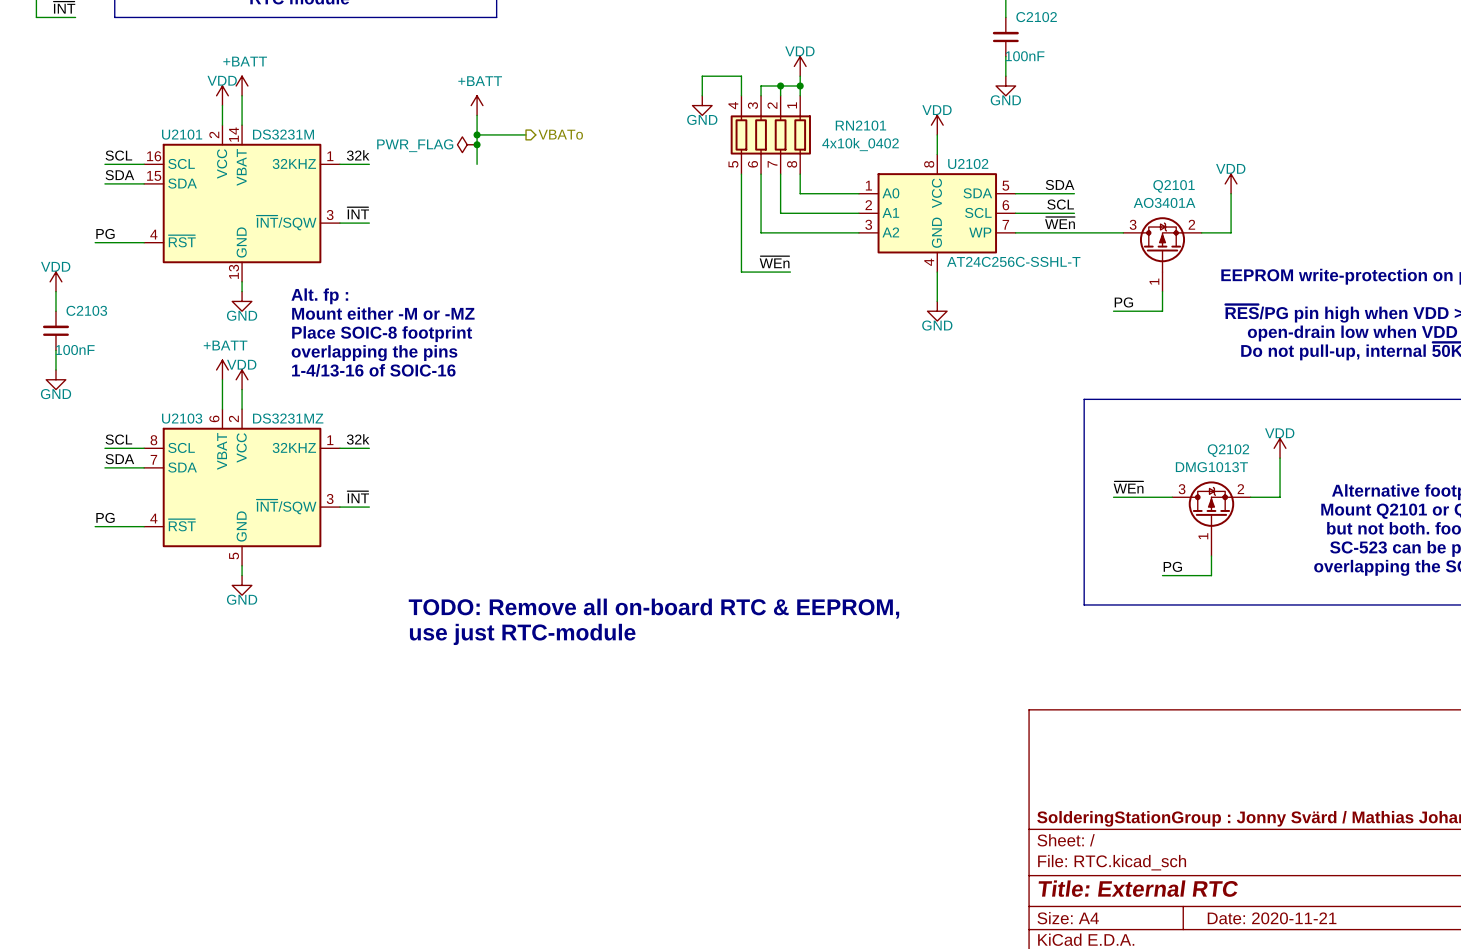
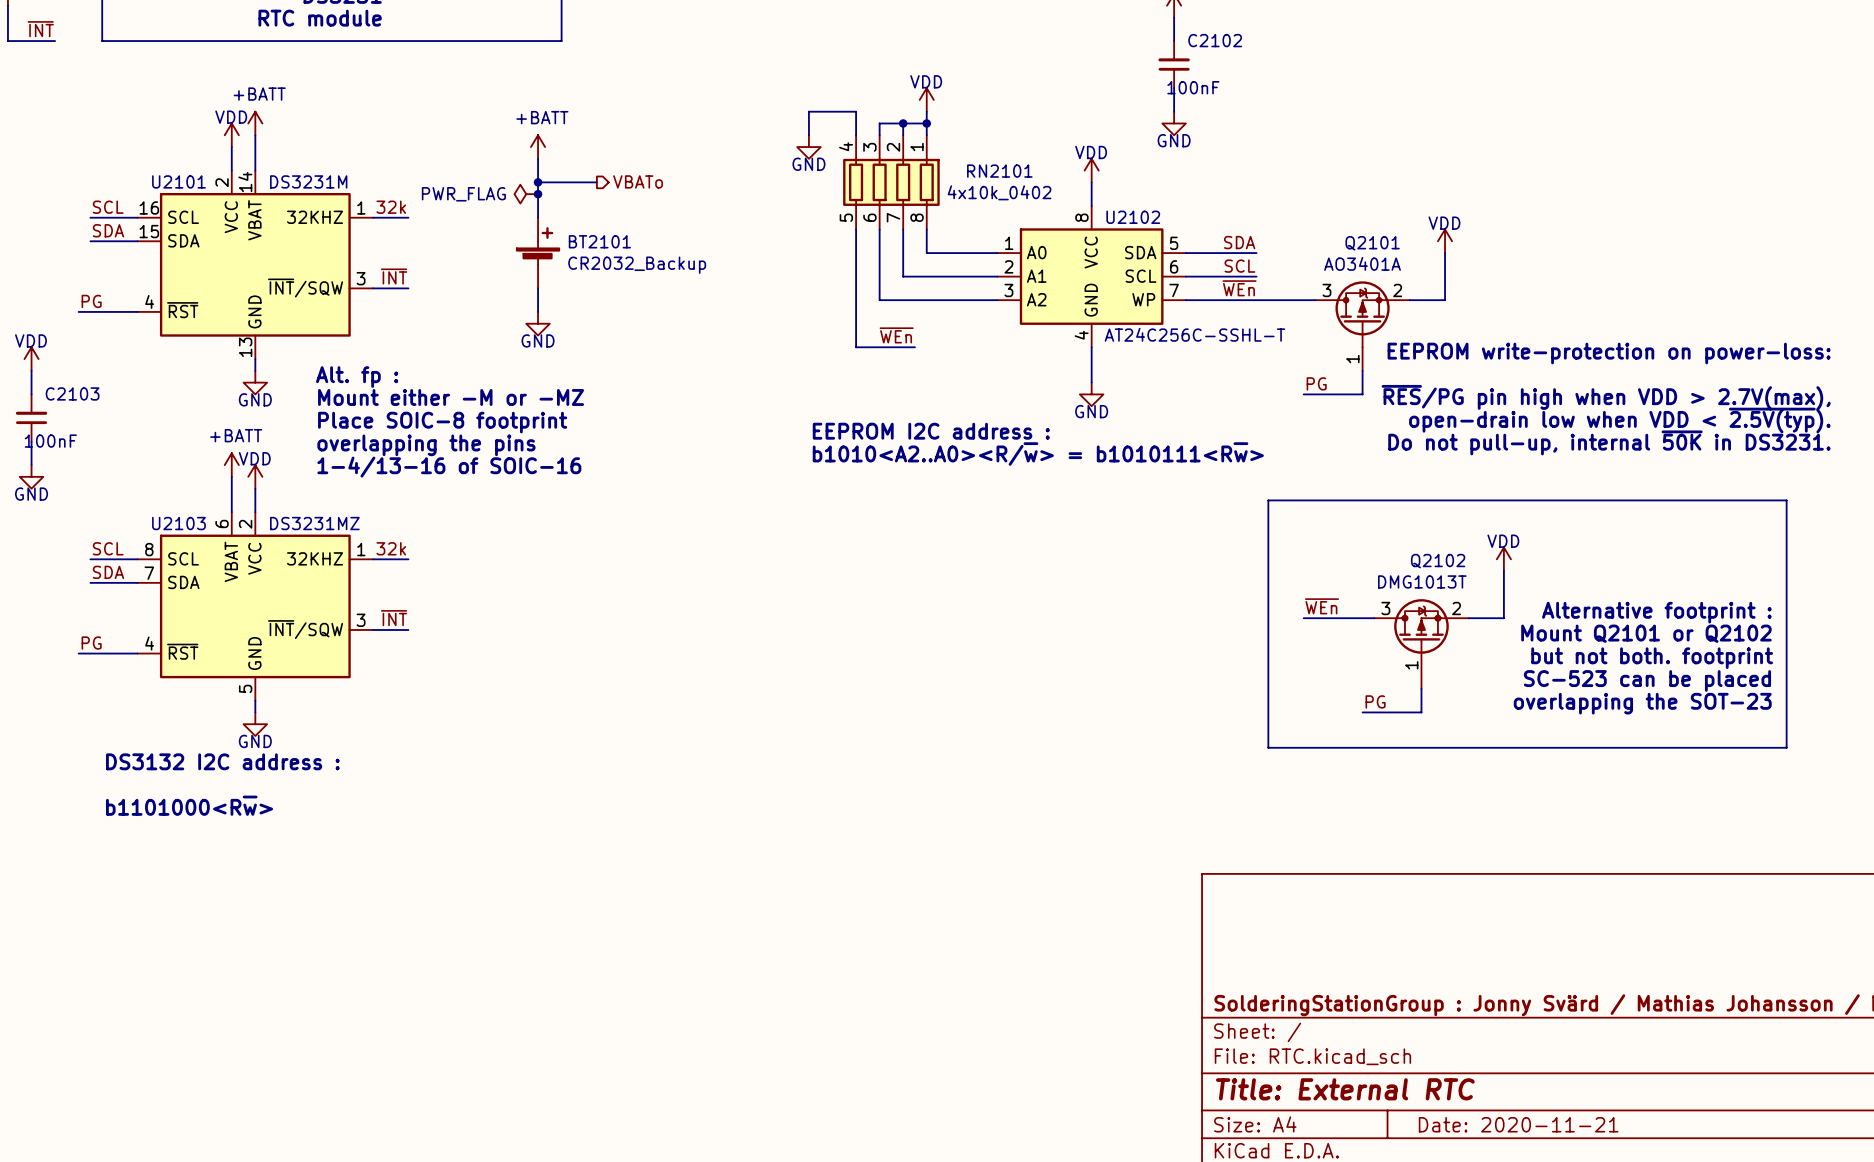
BT2101: none -> CR2032_Backup (538, 253)
wire: none -> (538, 288) (538, 311)
power symbol: none -> GND (538, 323)
text: none -> EEPROM I2C address : (931, 431)
text: none -> b1010<A2..A0><R/~{w}> = b1010111<R~{w}> (1038, 454)
text: TODO: Remove all on-board RTC & EEPROM, (653, 608) -> none
text: none -> DS3132 I2C address : (222, 761)
text: use just RTC-module (522, 634) -> none
text: none -> b1101000<R~{w}> (189, 805)

